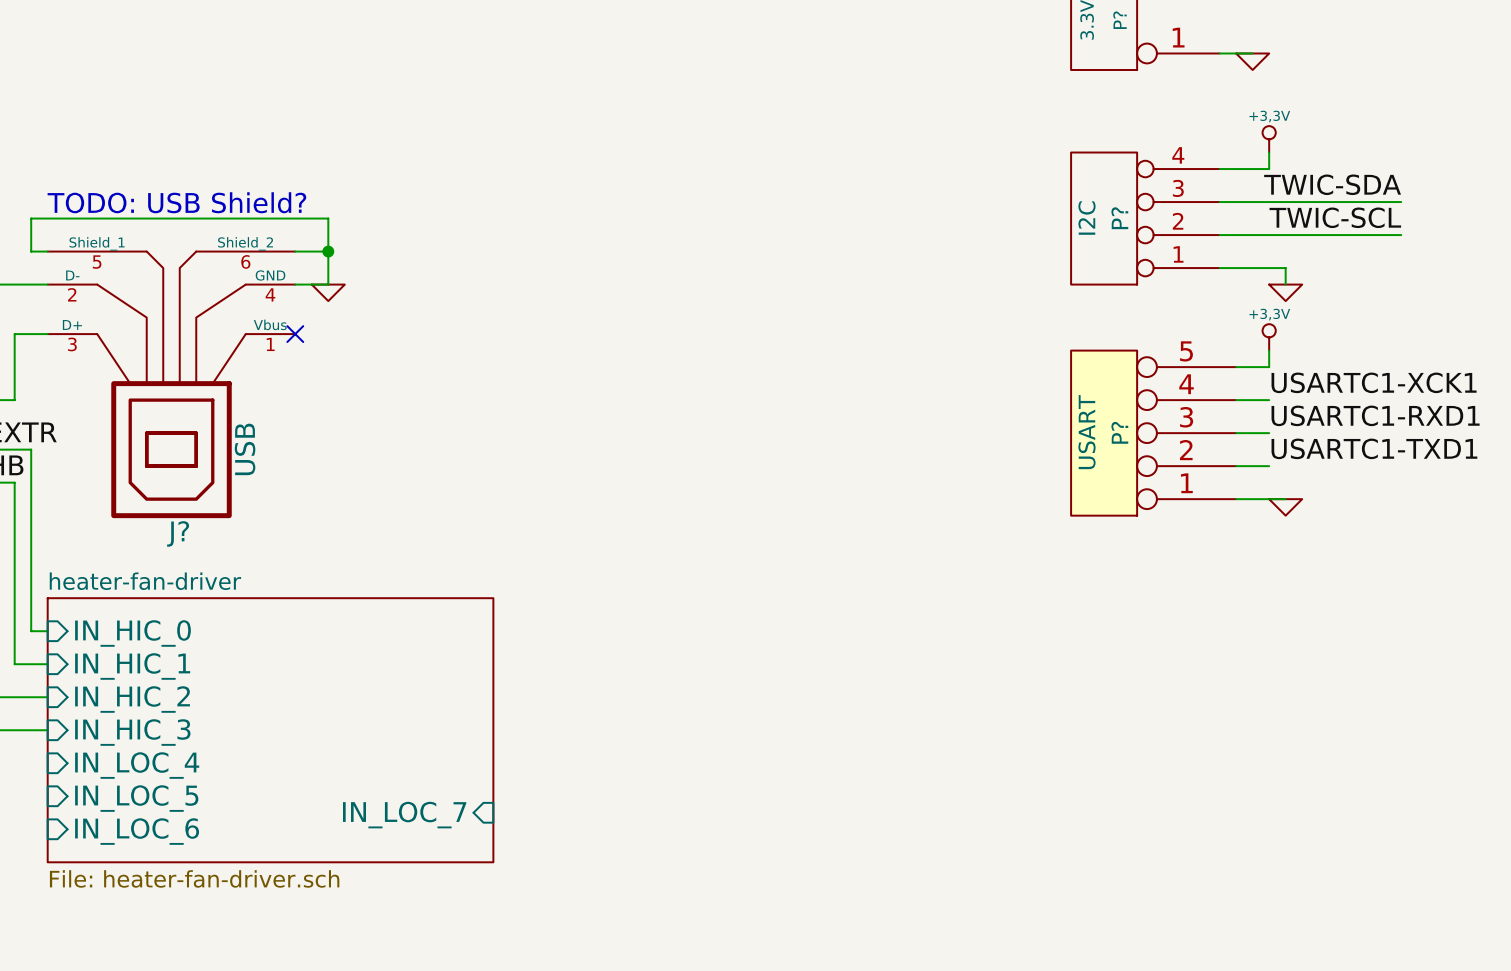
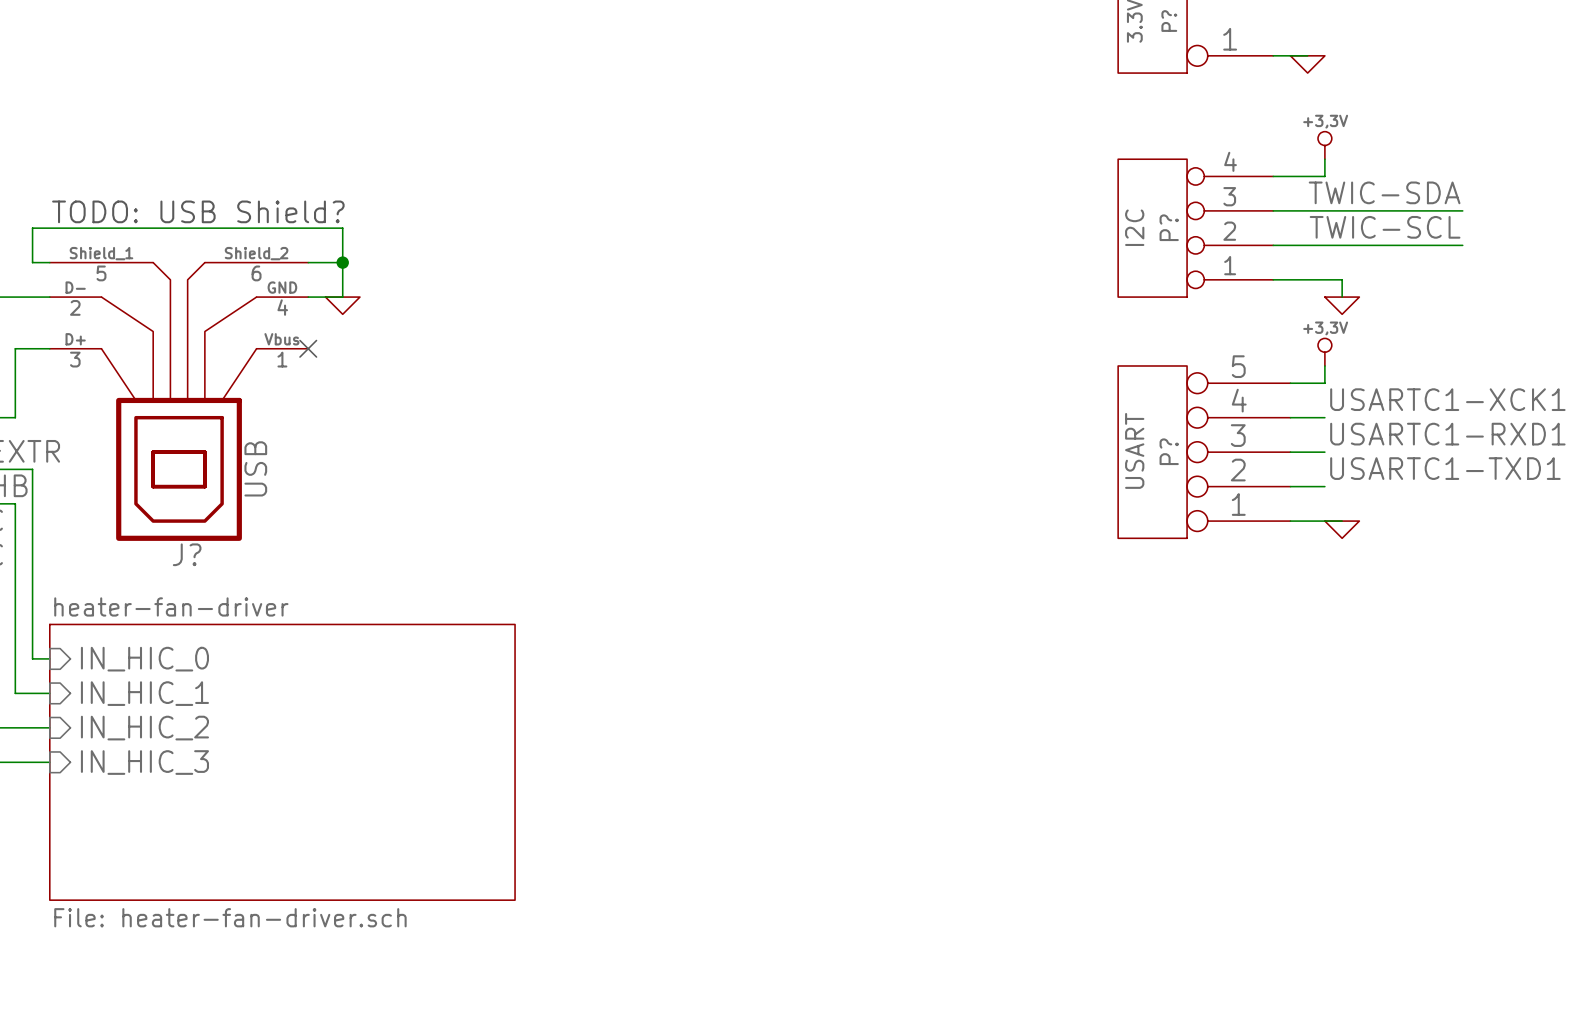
sheet pin: IN_LOC_4 (137, 765) -> none
sheet pin: IN_LOC_5 (136, 798) -> none
sheet pin: IN_LOC_7 (404, 815) -> none
sheet pin: IN_LOC_6 (137, 831) -> none

